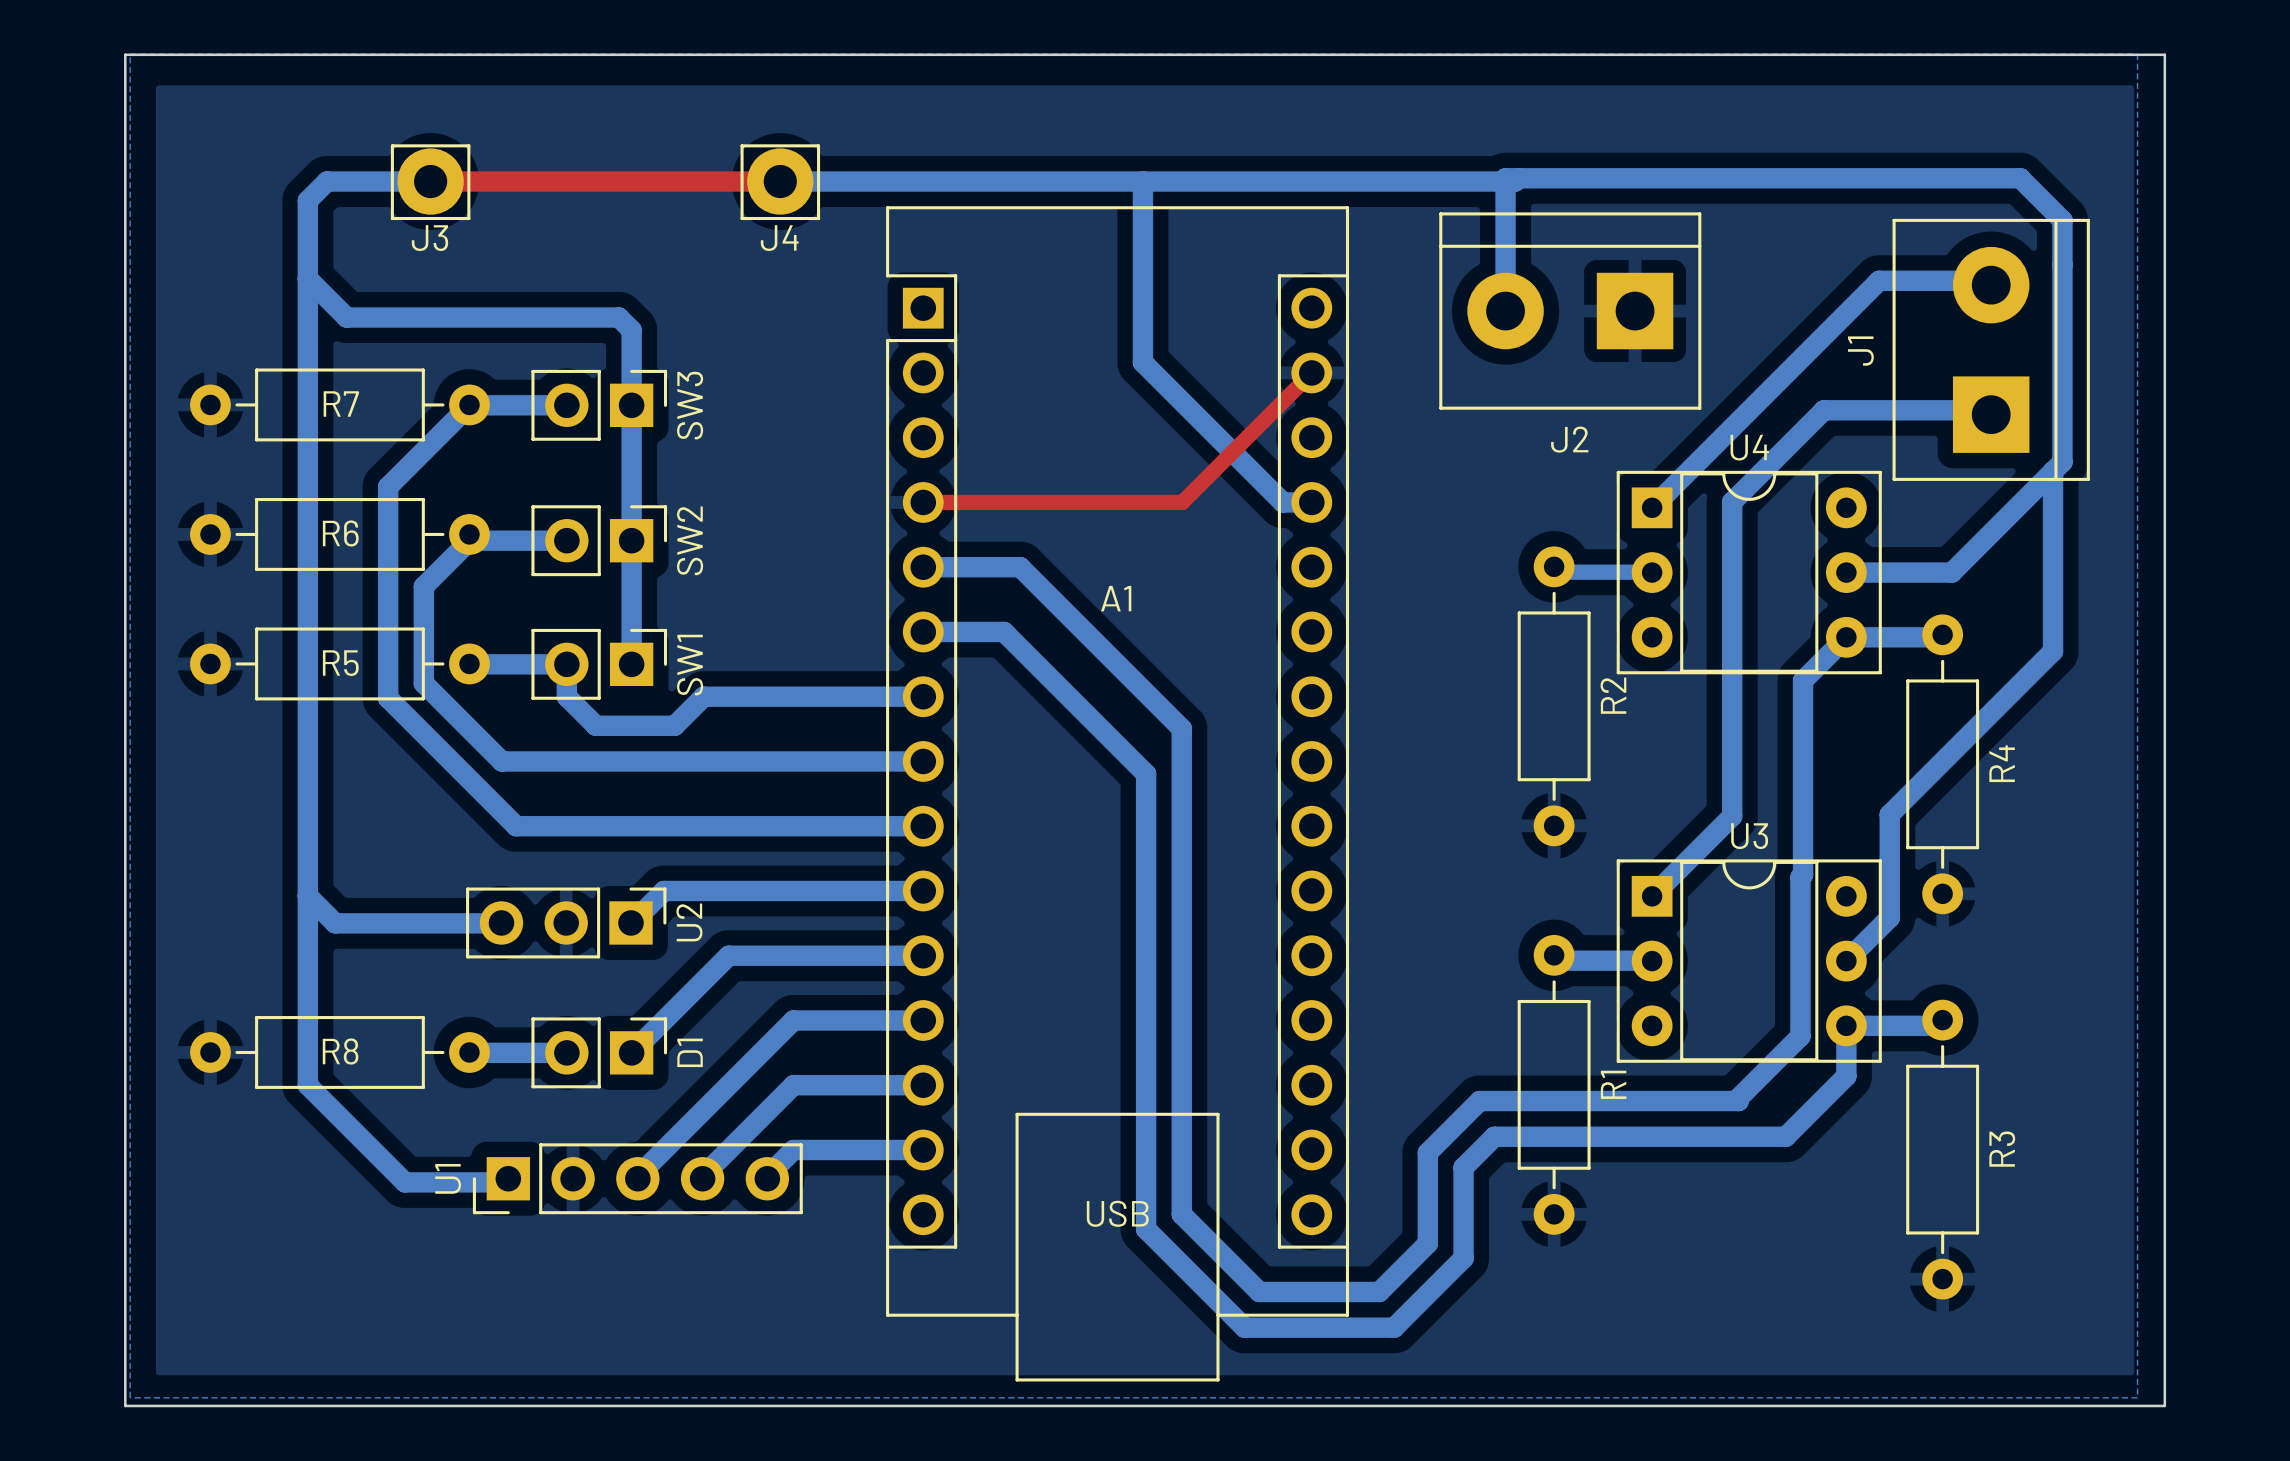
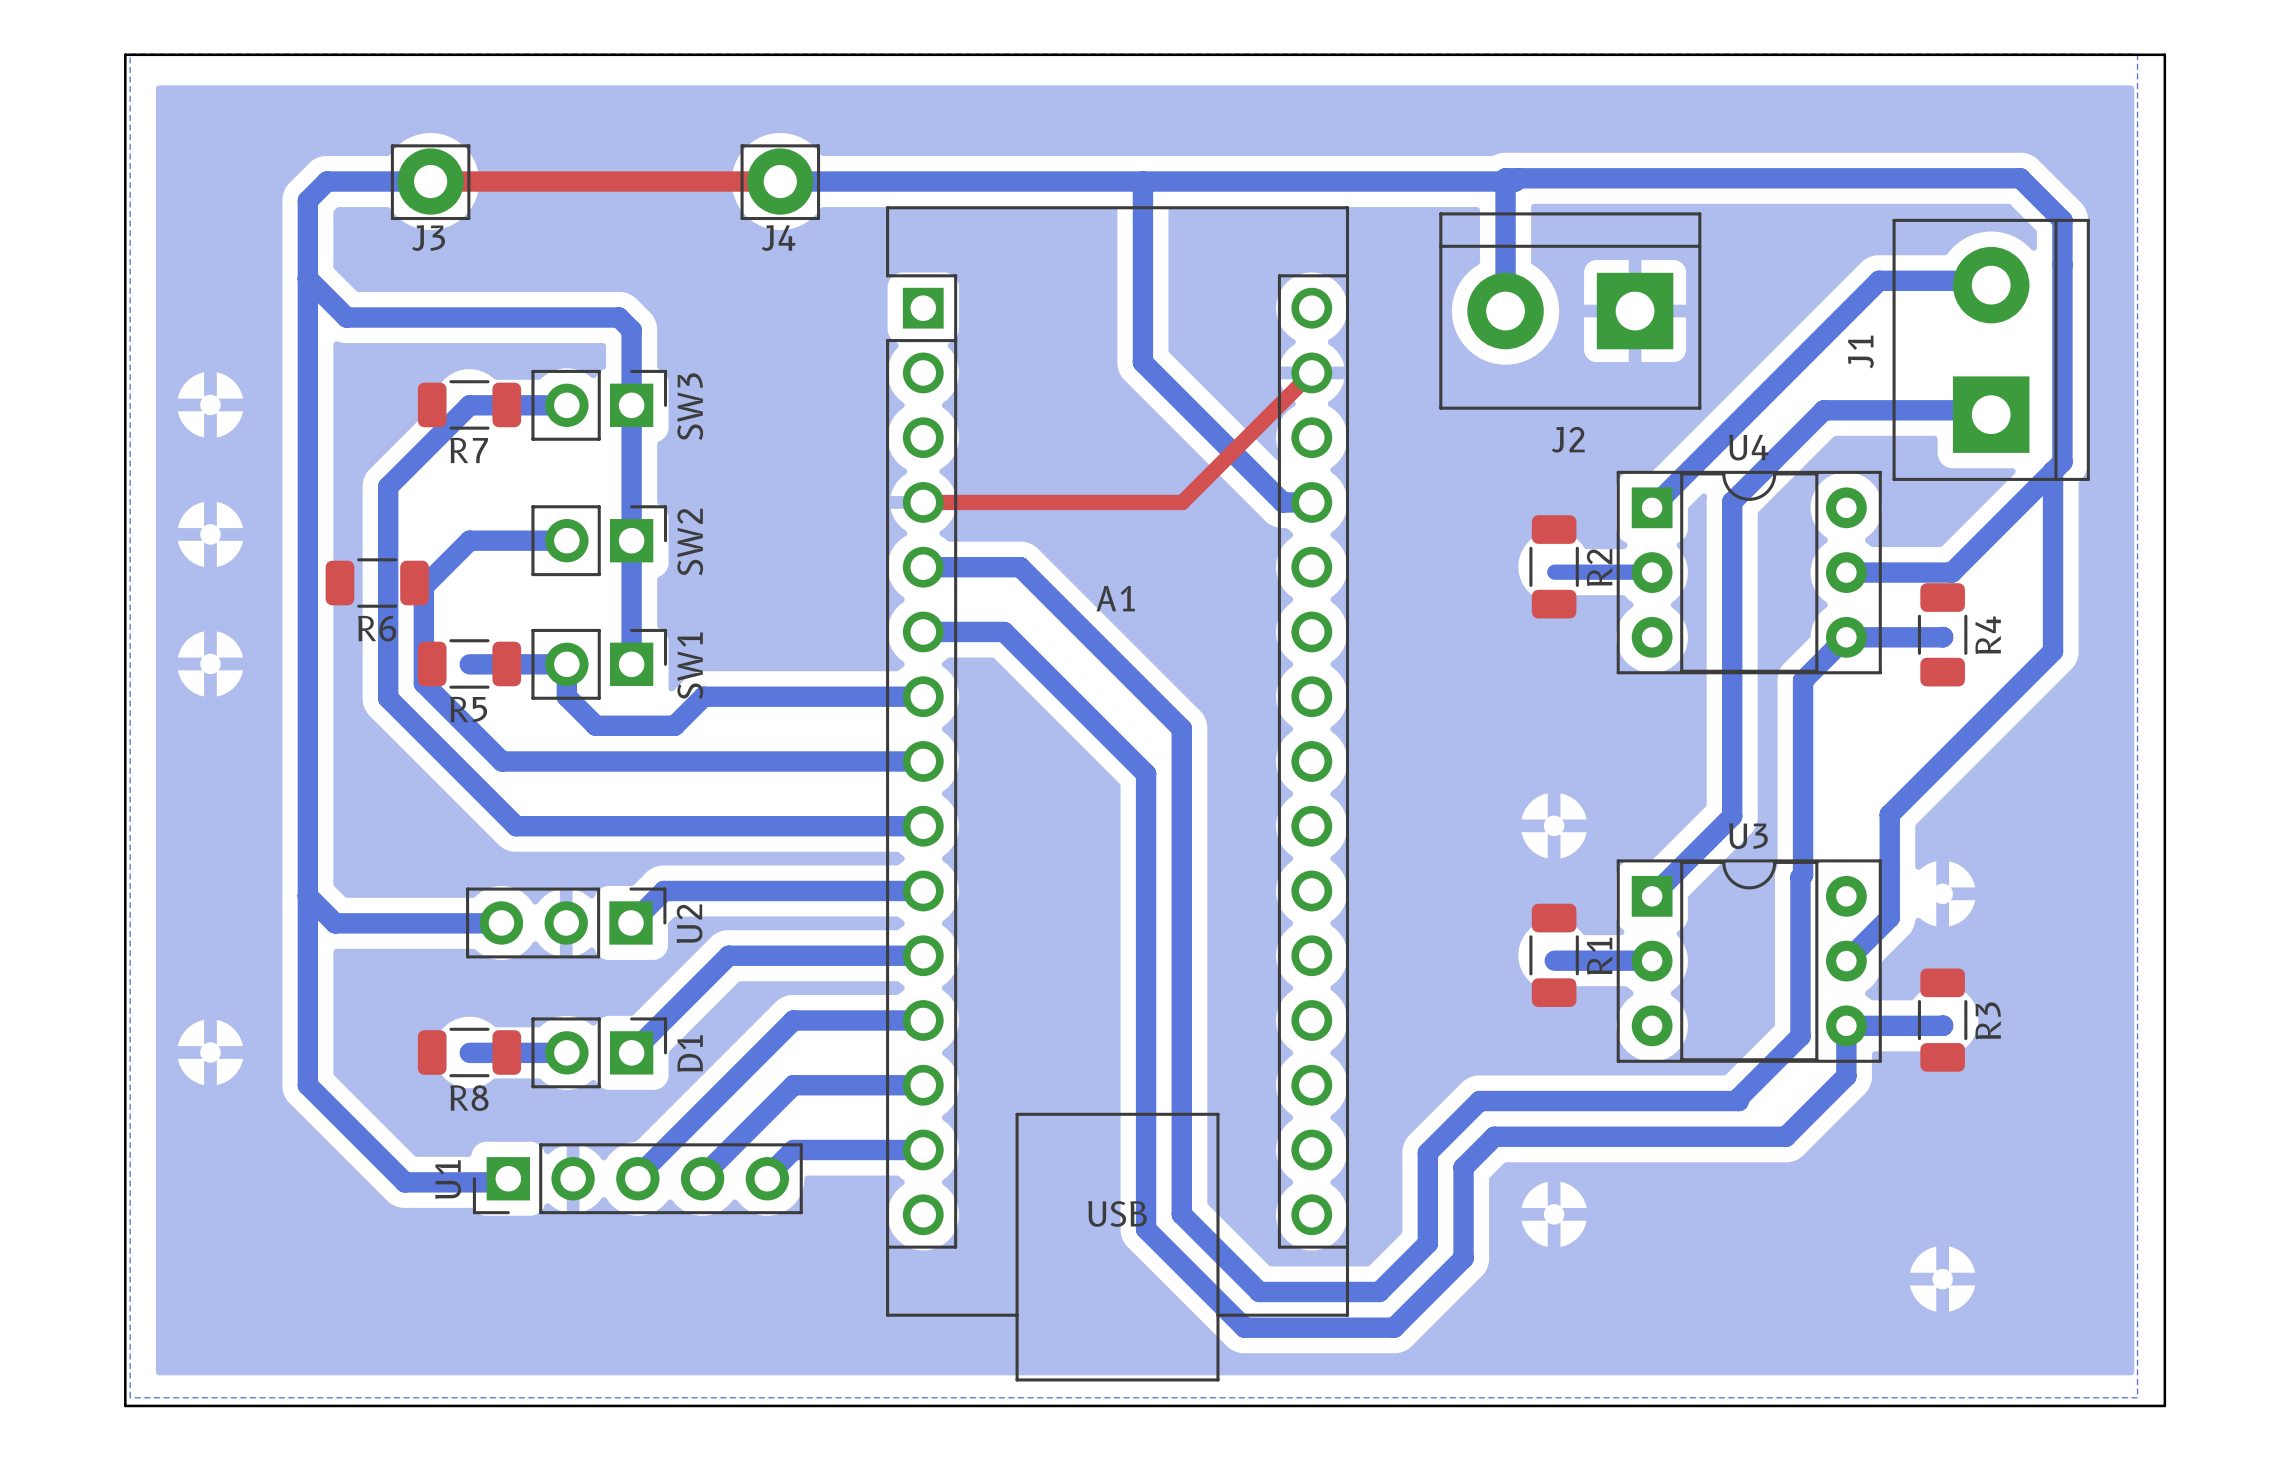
R7 footprint: [190, 368, 490, 442] -> [417, 380, 522, 430]
R6 footprint: [190, 497, 490, 571] -> [325, 558, 429, 608]
R2 footprint: [1517, 546, 1591, 847] -> [1529, 515, 1579, 619]
R4 footprint: [1906, 614, 1980, 915] -> [1917, 583, 1968, 687]
R5 footprint: [190, 627, 490, 701] -> [417, 639, 522, 689]
R1 footprint: [1517, 934, 1591, 1235] -> [1529, 903, 1579, 1007]
R3 footprint: [1906, 999, 1980, 1300] -> [1917, 968, 1968, 1072]
R8 footprint: [190, 1016, 490, 1089] -> [417, 1027, 522, 1078]

